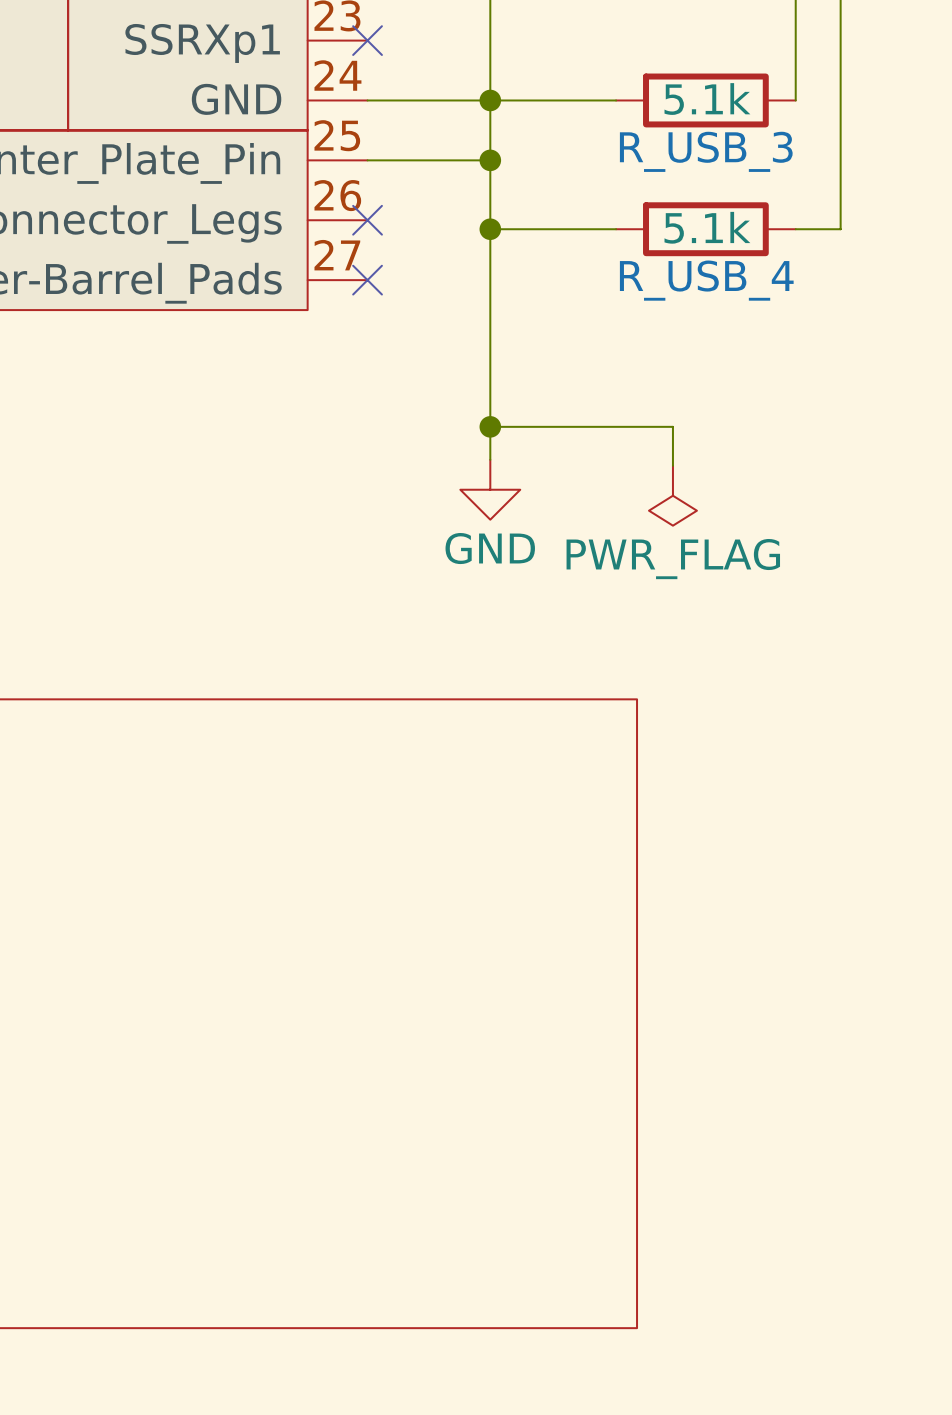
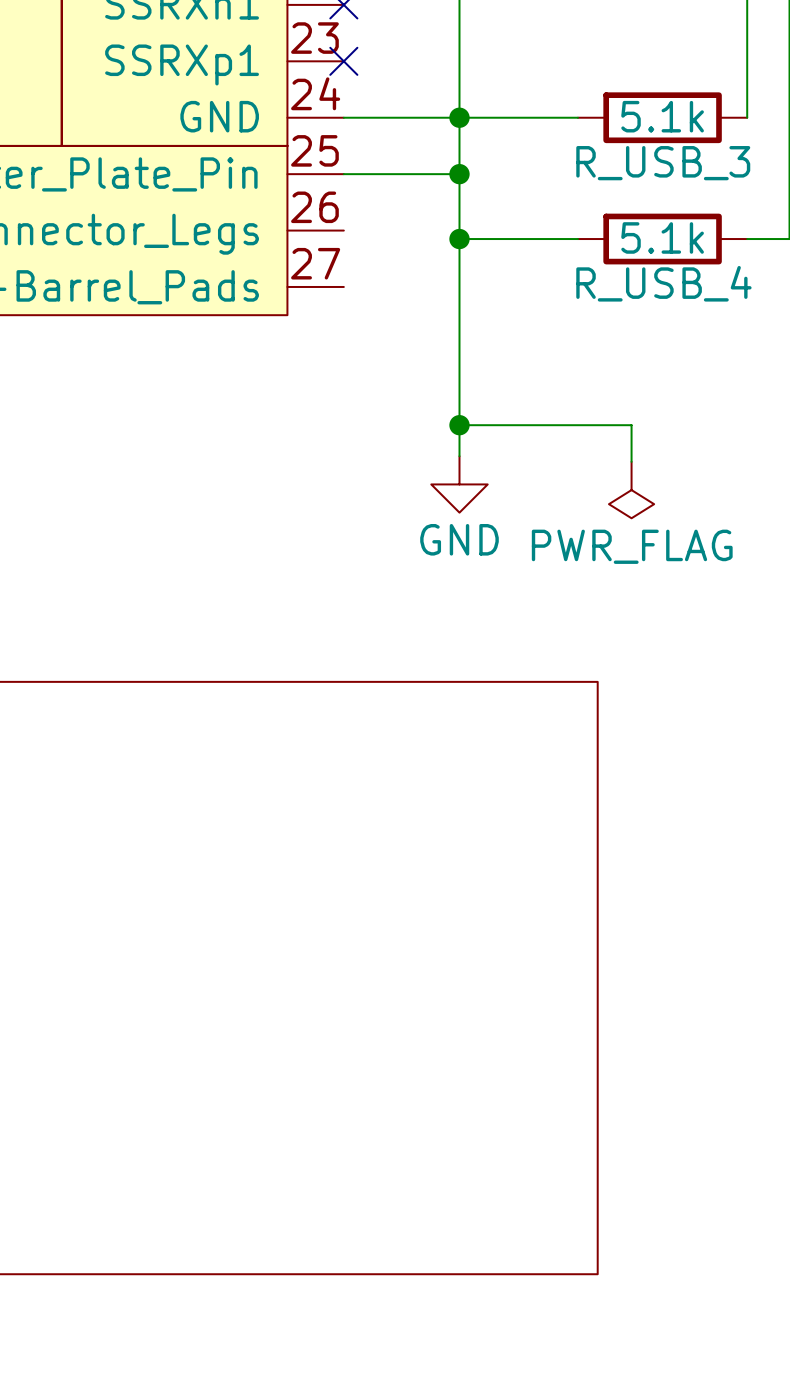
no-connect mark: (367, 220) -> none
no-connect mark: (367, 280) -> none

